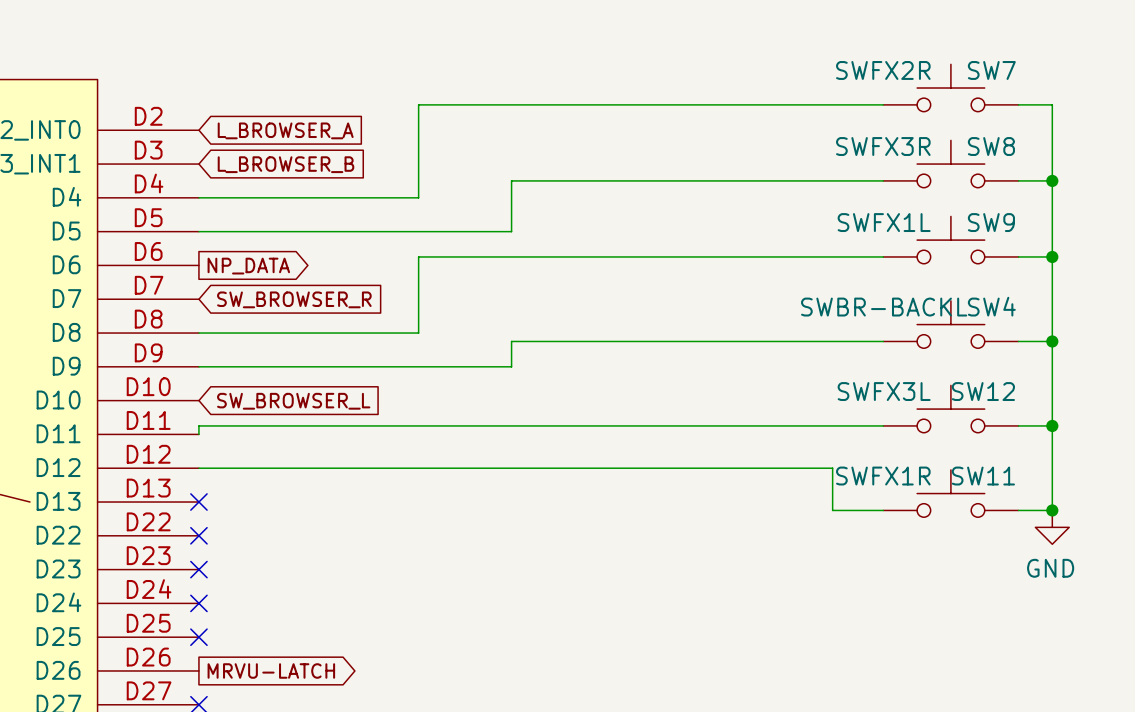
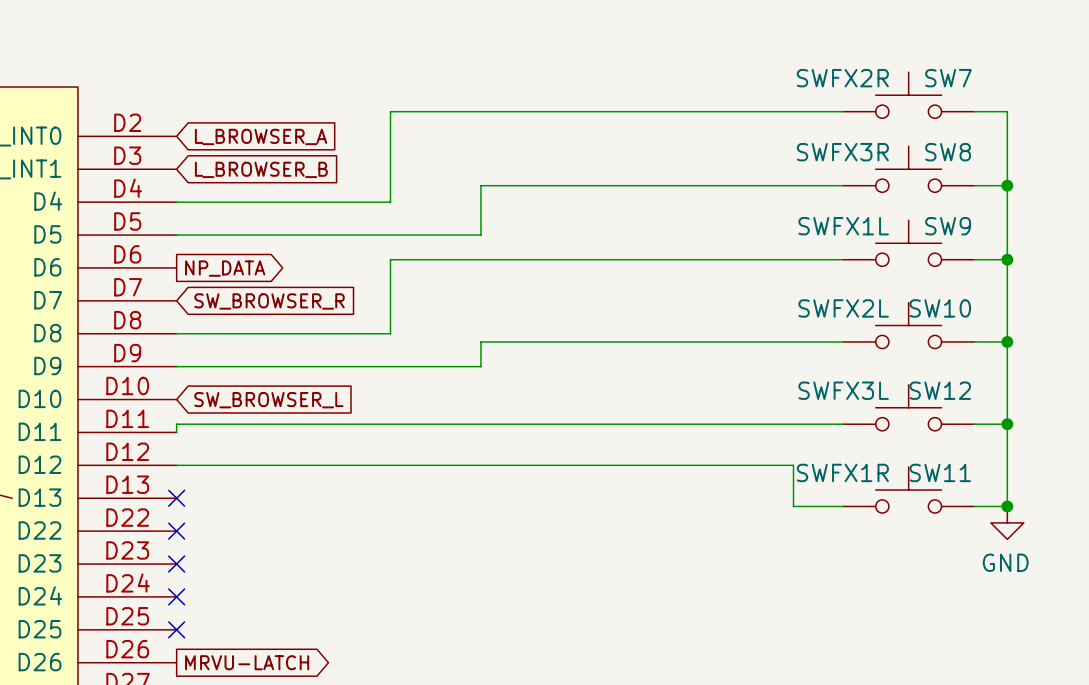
SW4 name: SW4 (991, 306) -> SW10 (940, 308)
SW4 value: SWBR-BACKL (884, 307) -> SWFX2L (843, 308)

